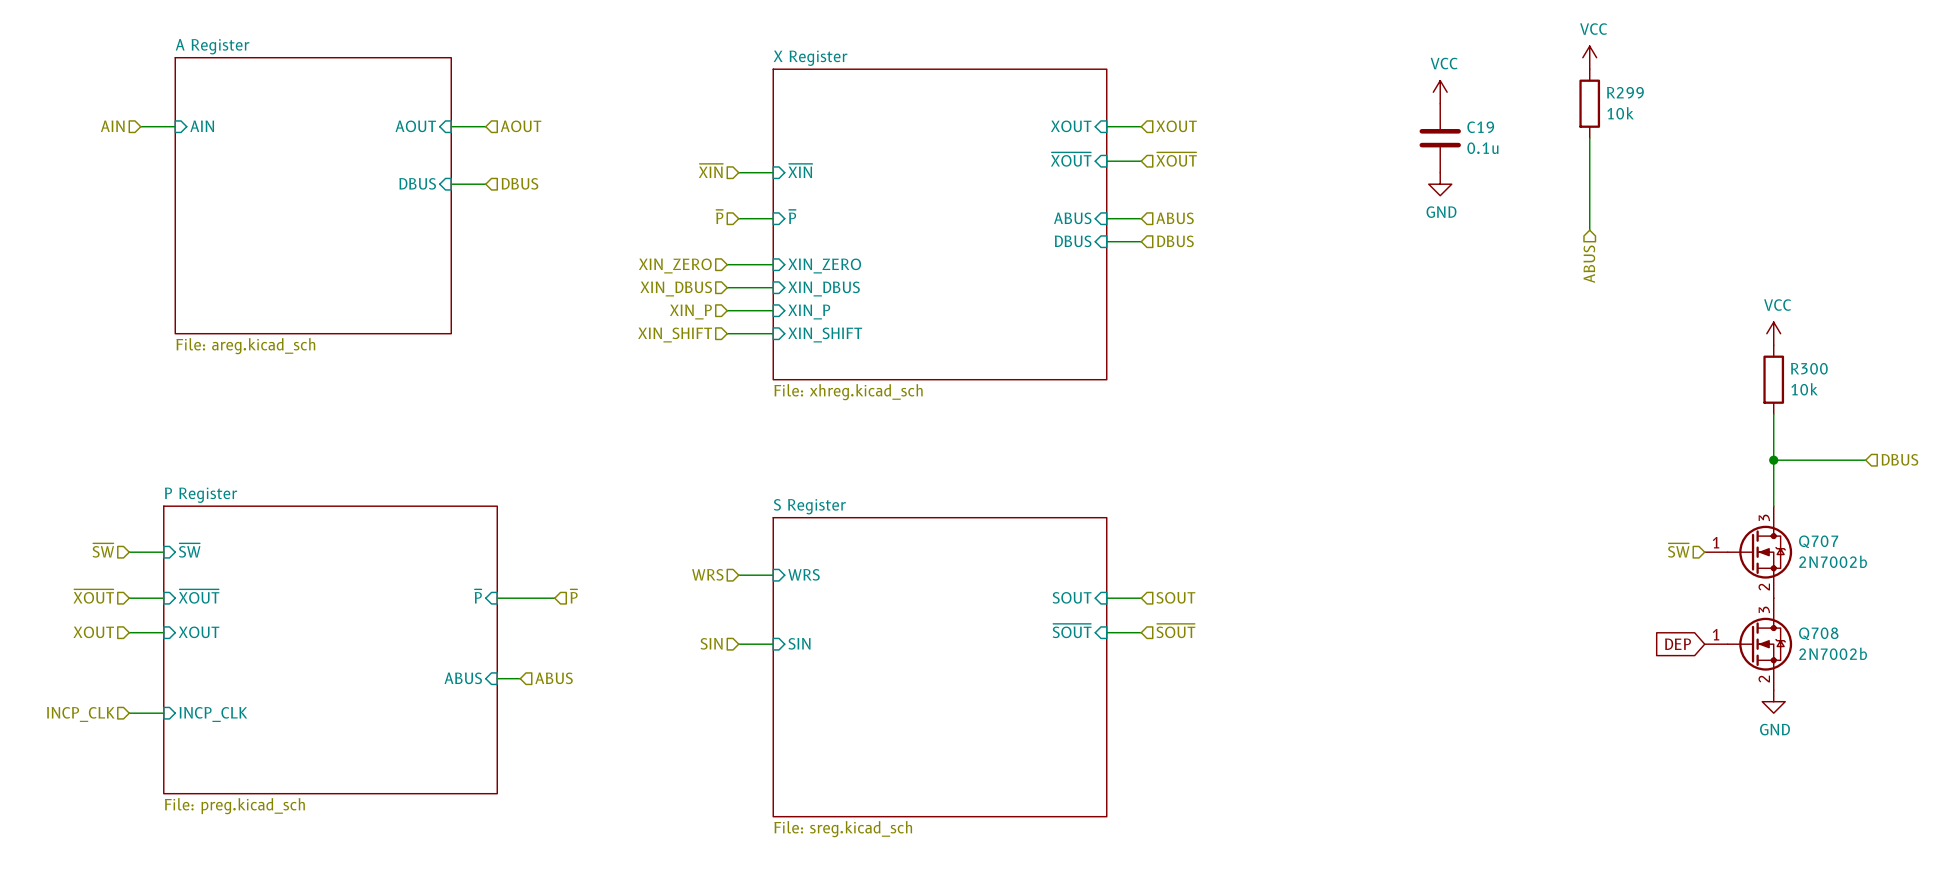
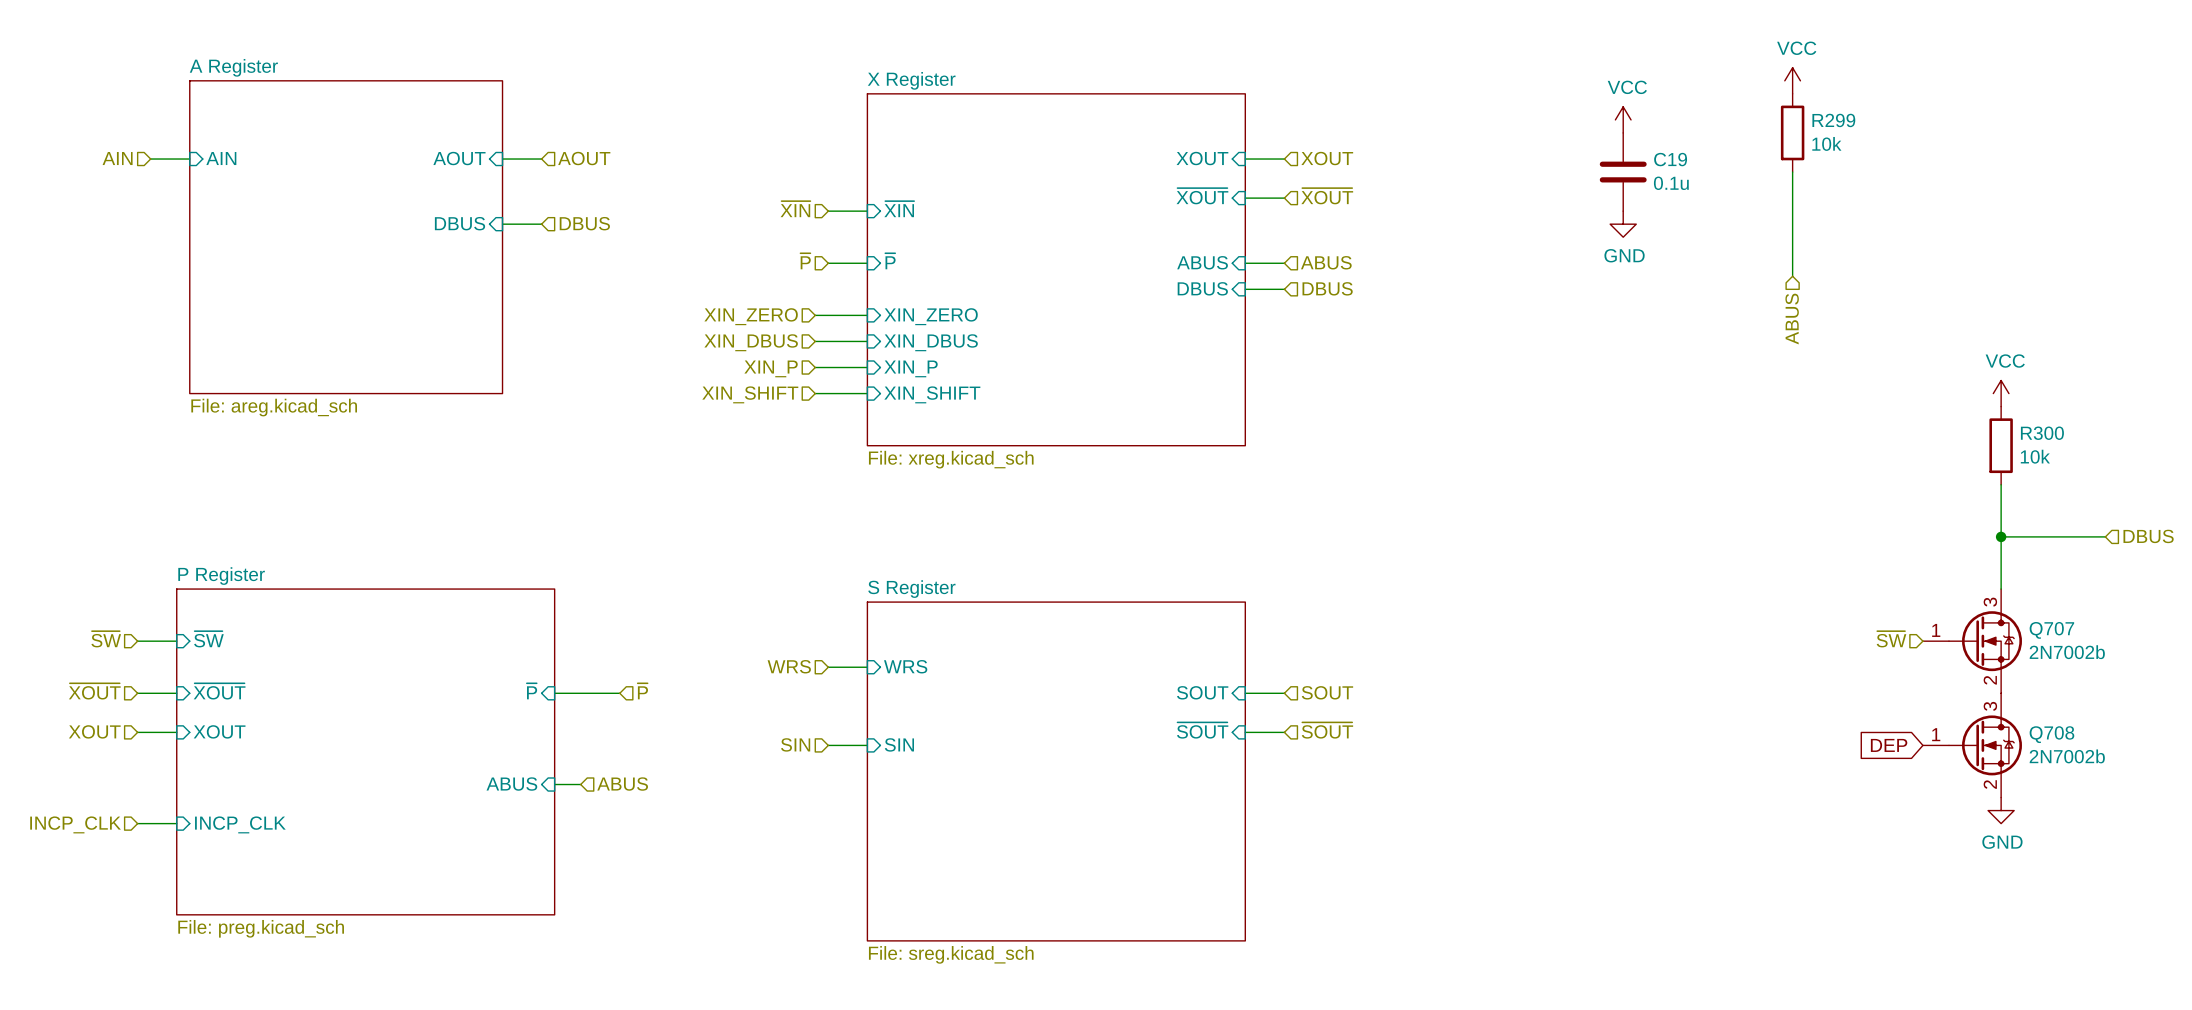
sheet X Register value: File: xhreg.kicad_sch (848, 392) -> File: xreg.kicad_sch (951, 459)

